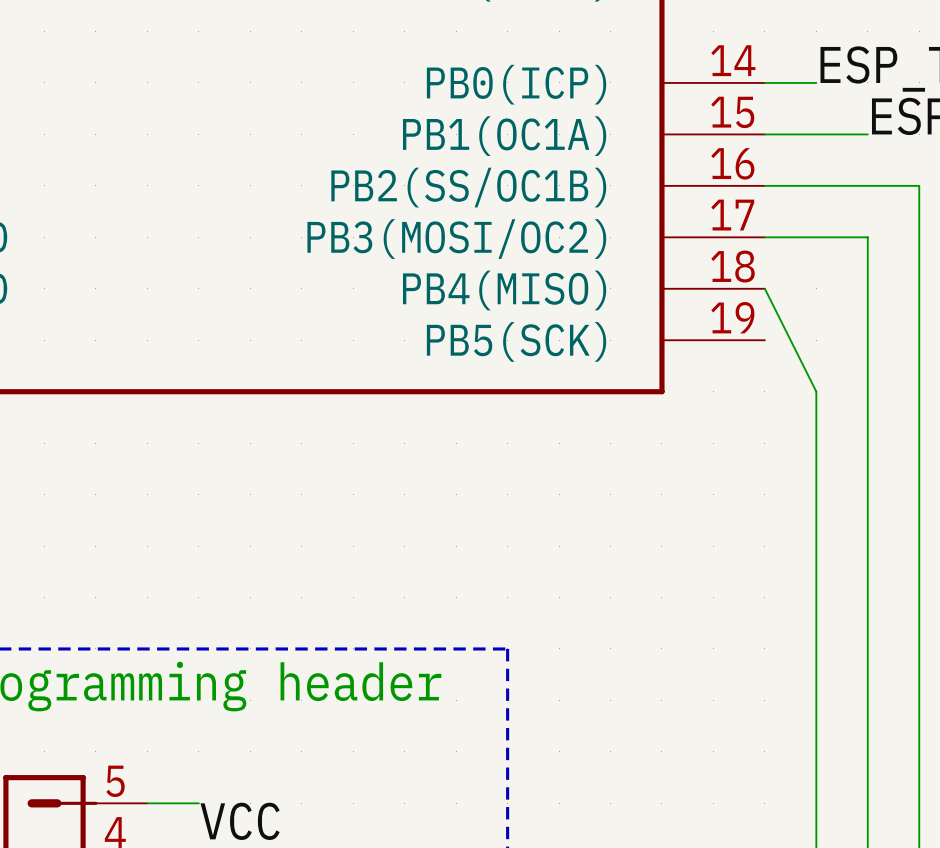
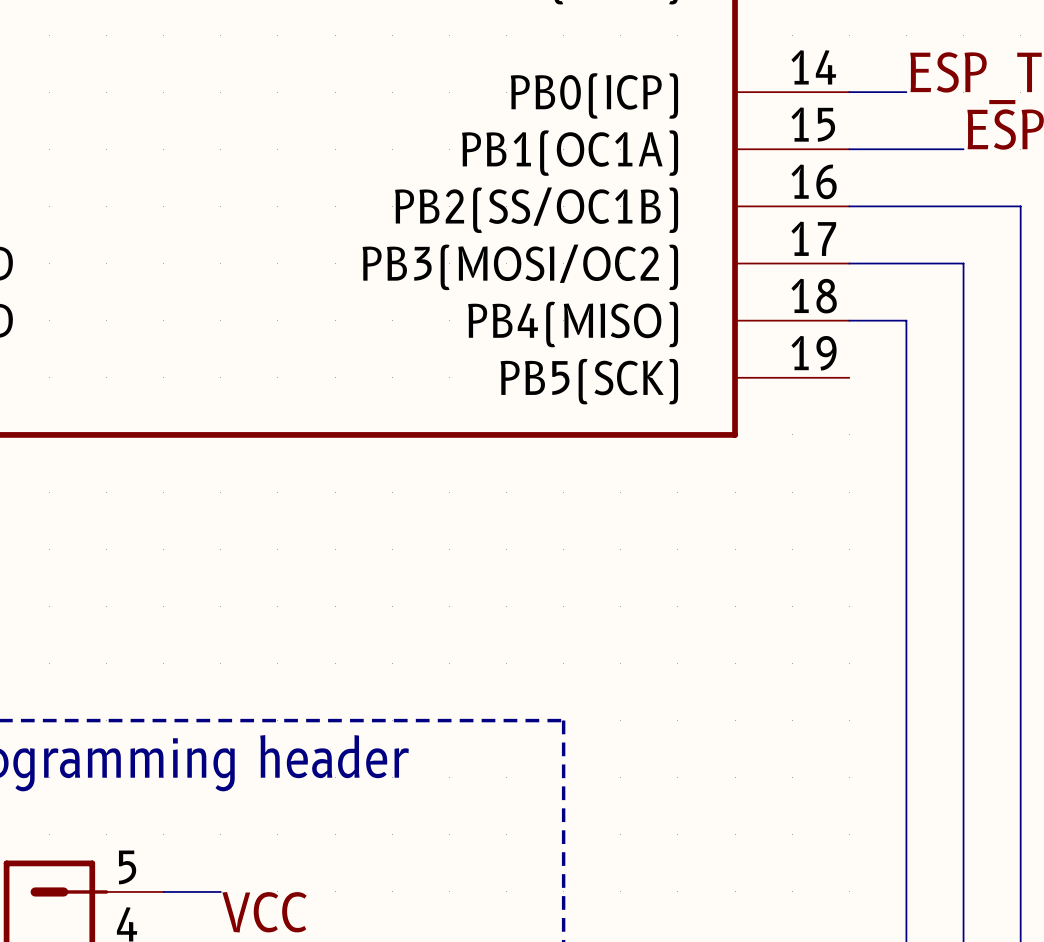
wire: (764, 288) (816, 391) -> (849, 320) (906, 320) (906, 434)

